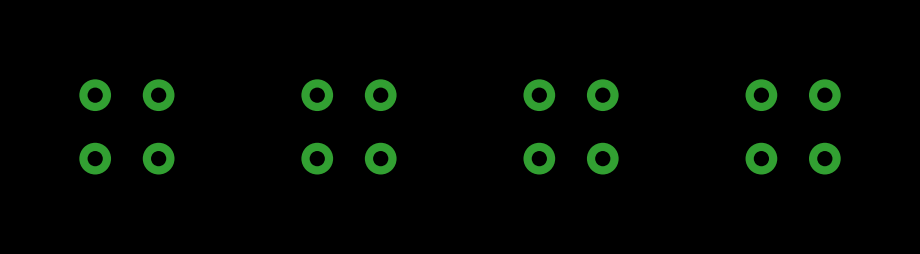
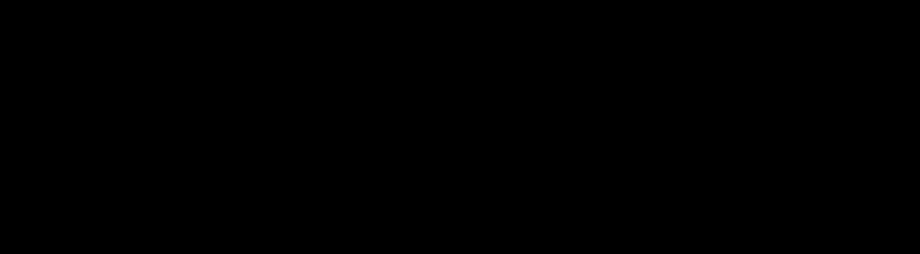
part: (126, 126) -> none
part: (348, 126) -> none
part: (571, 126) -> none
part: (793, 126) -> none

